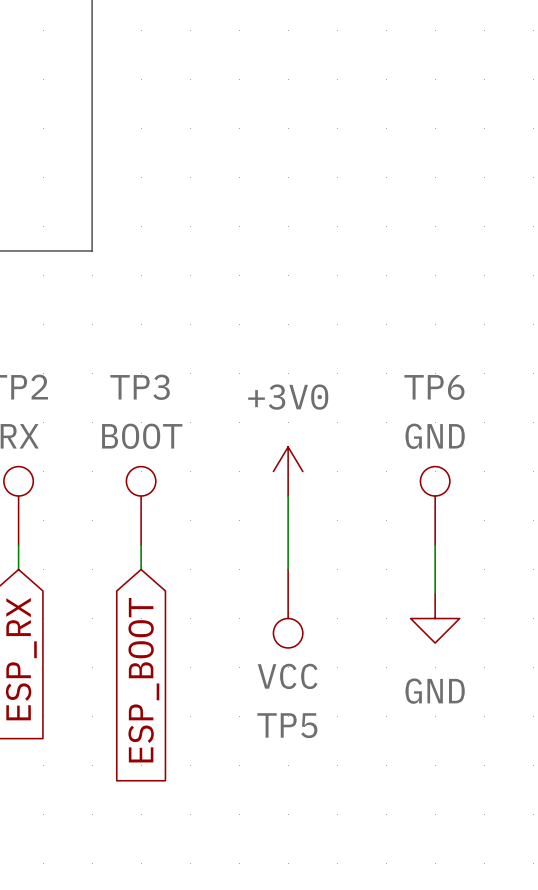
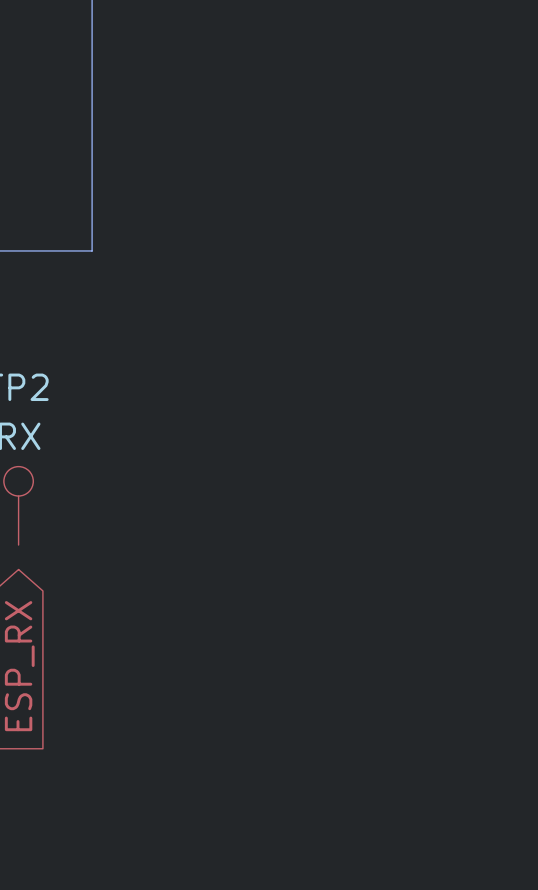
power symbol: +3V0 (288, 471) -> none
wire: (288, 496) (288, 569) -> none
TP3: BOOT (141, 505) -> none
TP6: GND (435, 505) -> none
wire: (18, 545) (18, 569) -> none
wire: (141, 545) (141, 569) -> none
wire: (435, 545) (435, 594) -> none
TP5: VCC (288, 608) -> none
power symbol: GND (435, 618) -> none
global label: ESP_BOOT (143, 680) -> none

